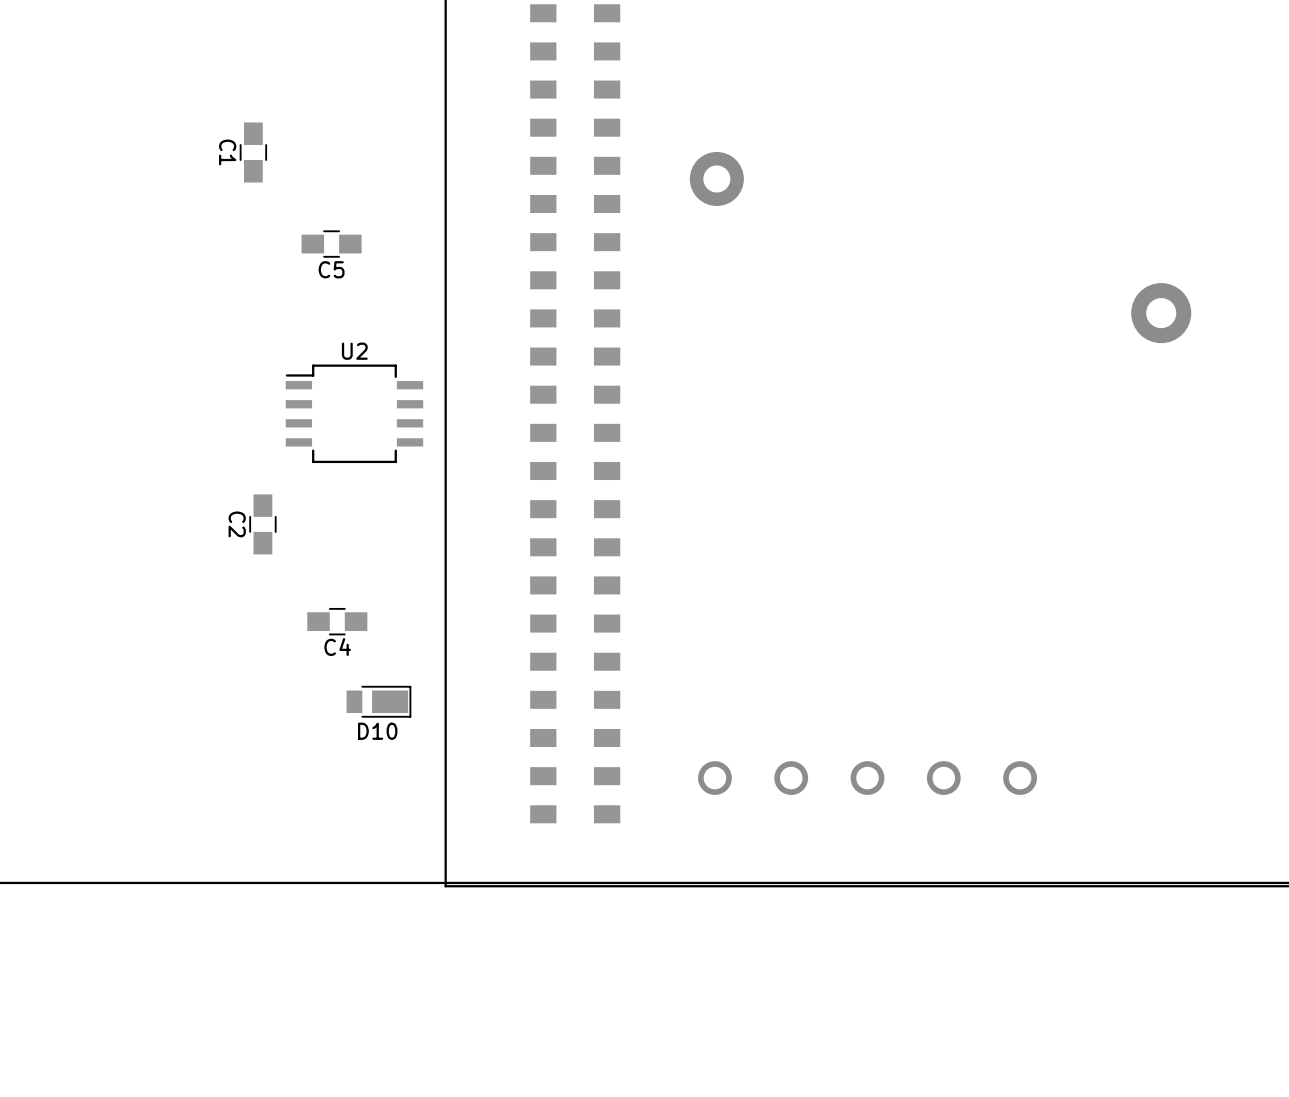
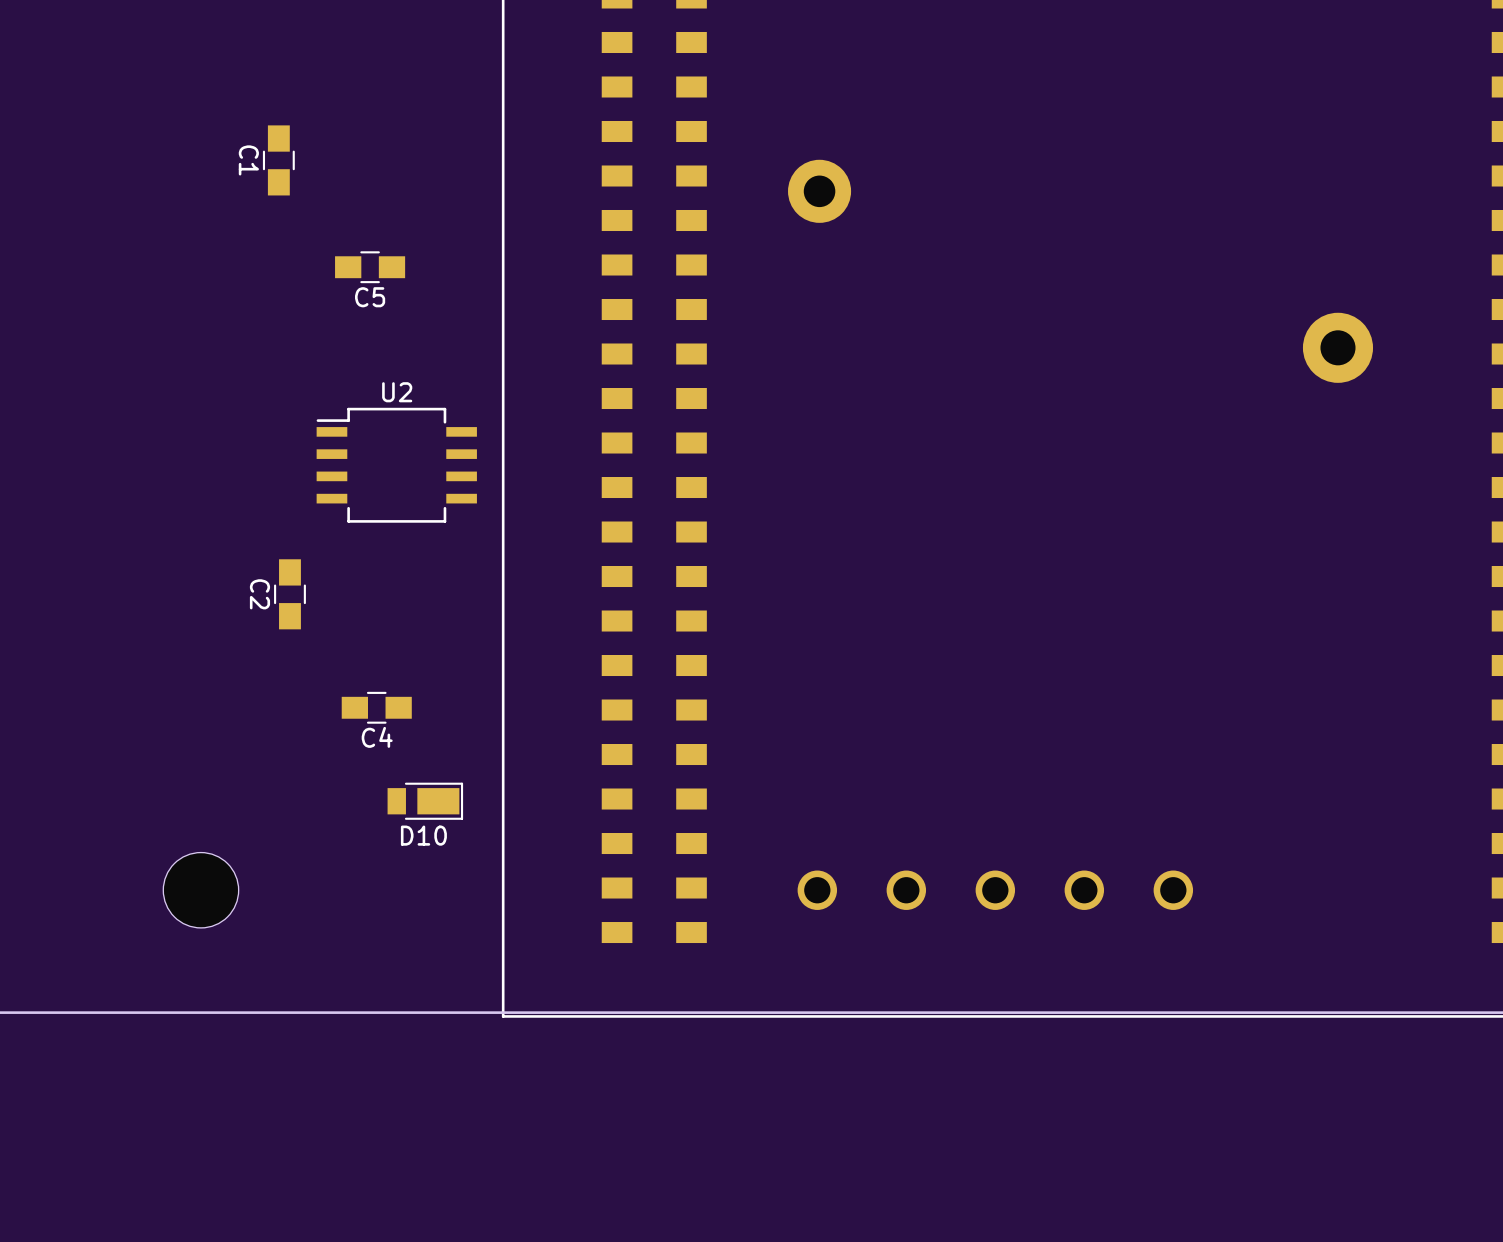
part: none -> (200, 890)

